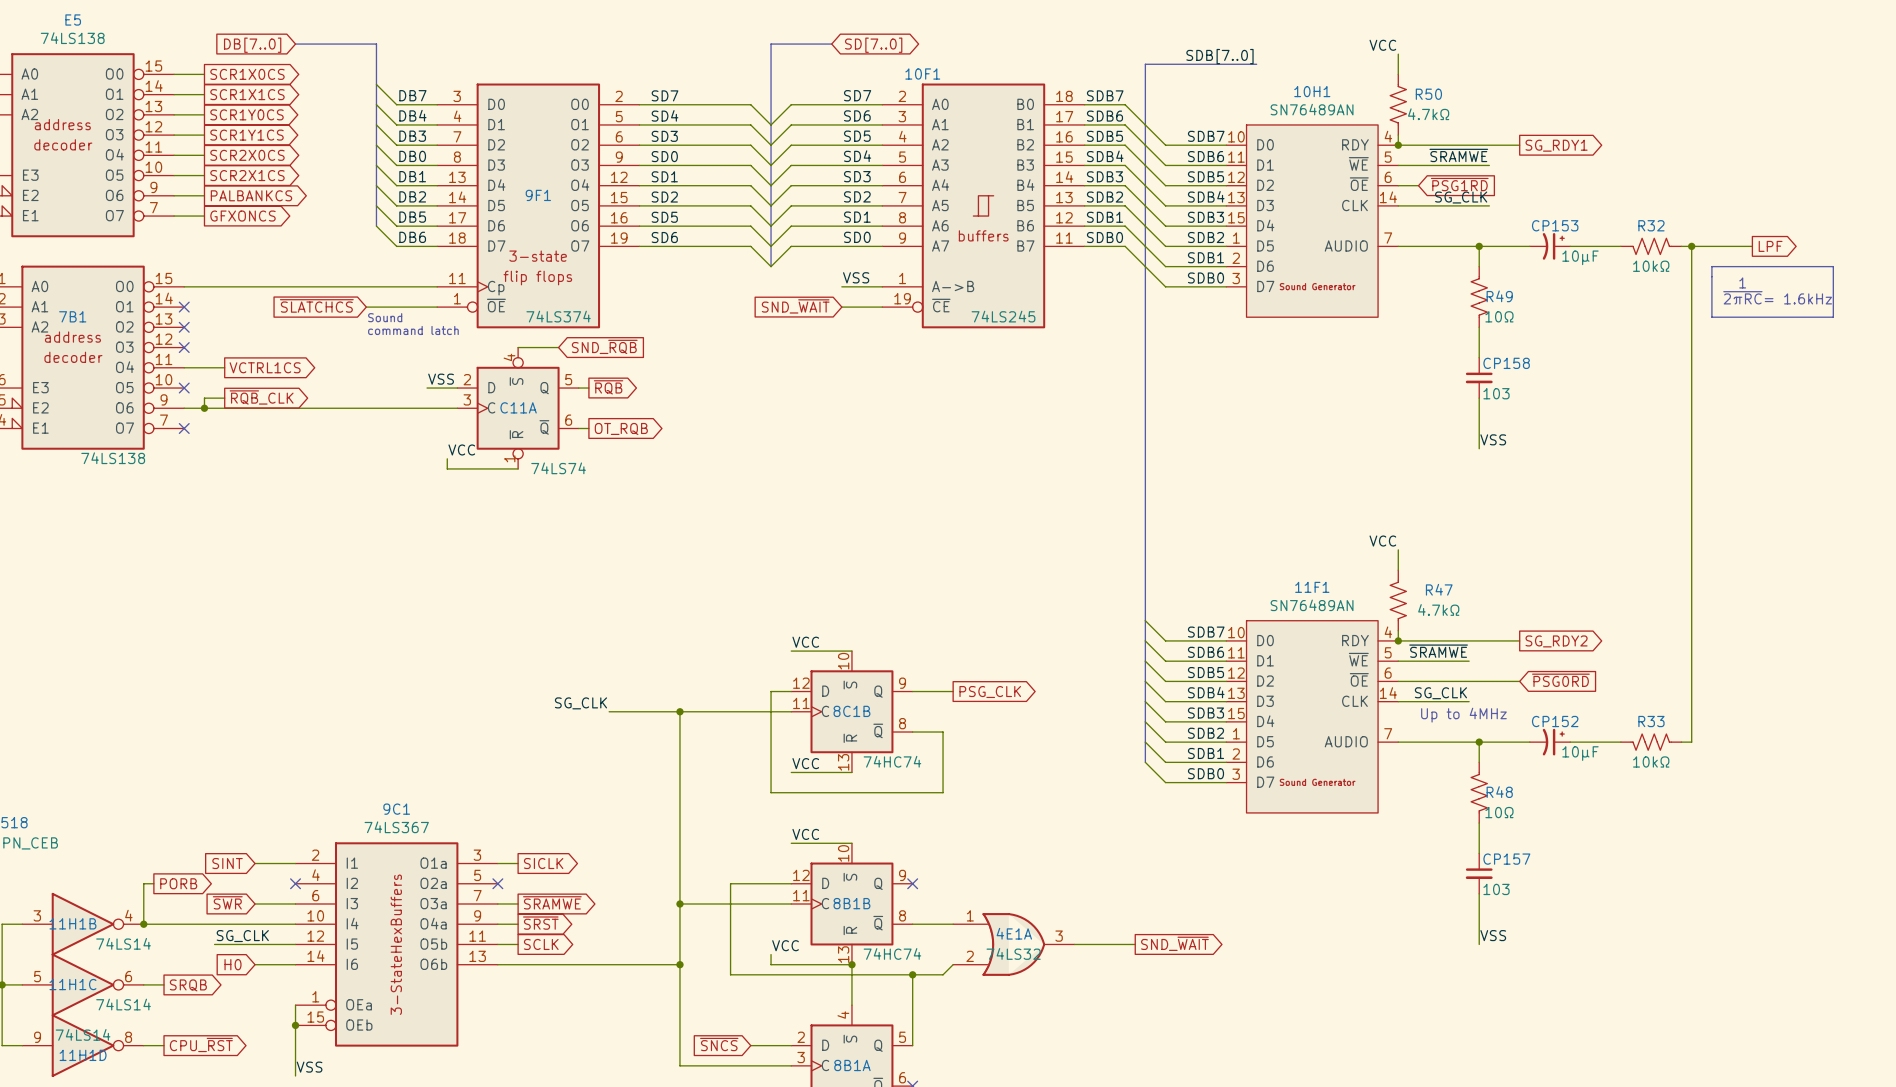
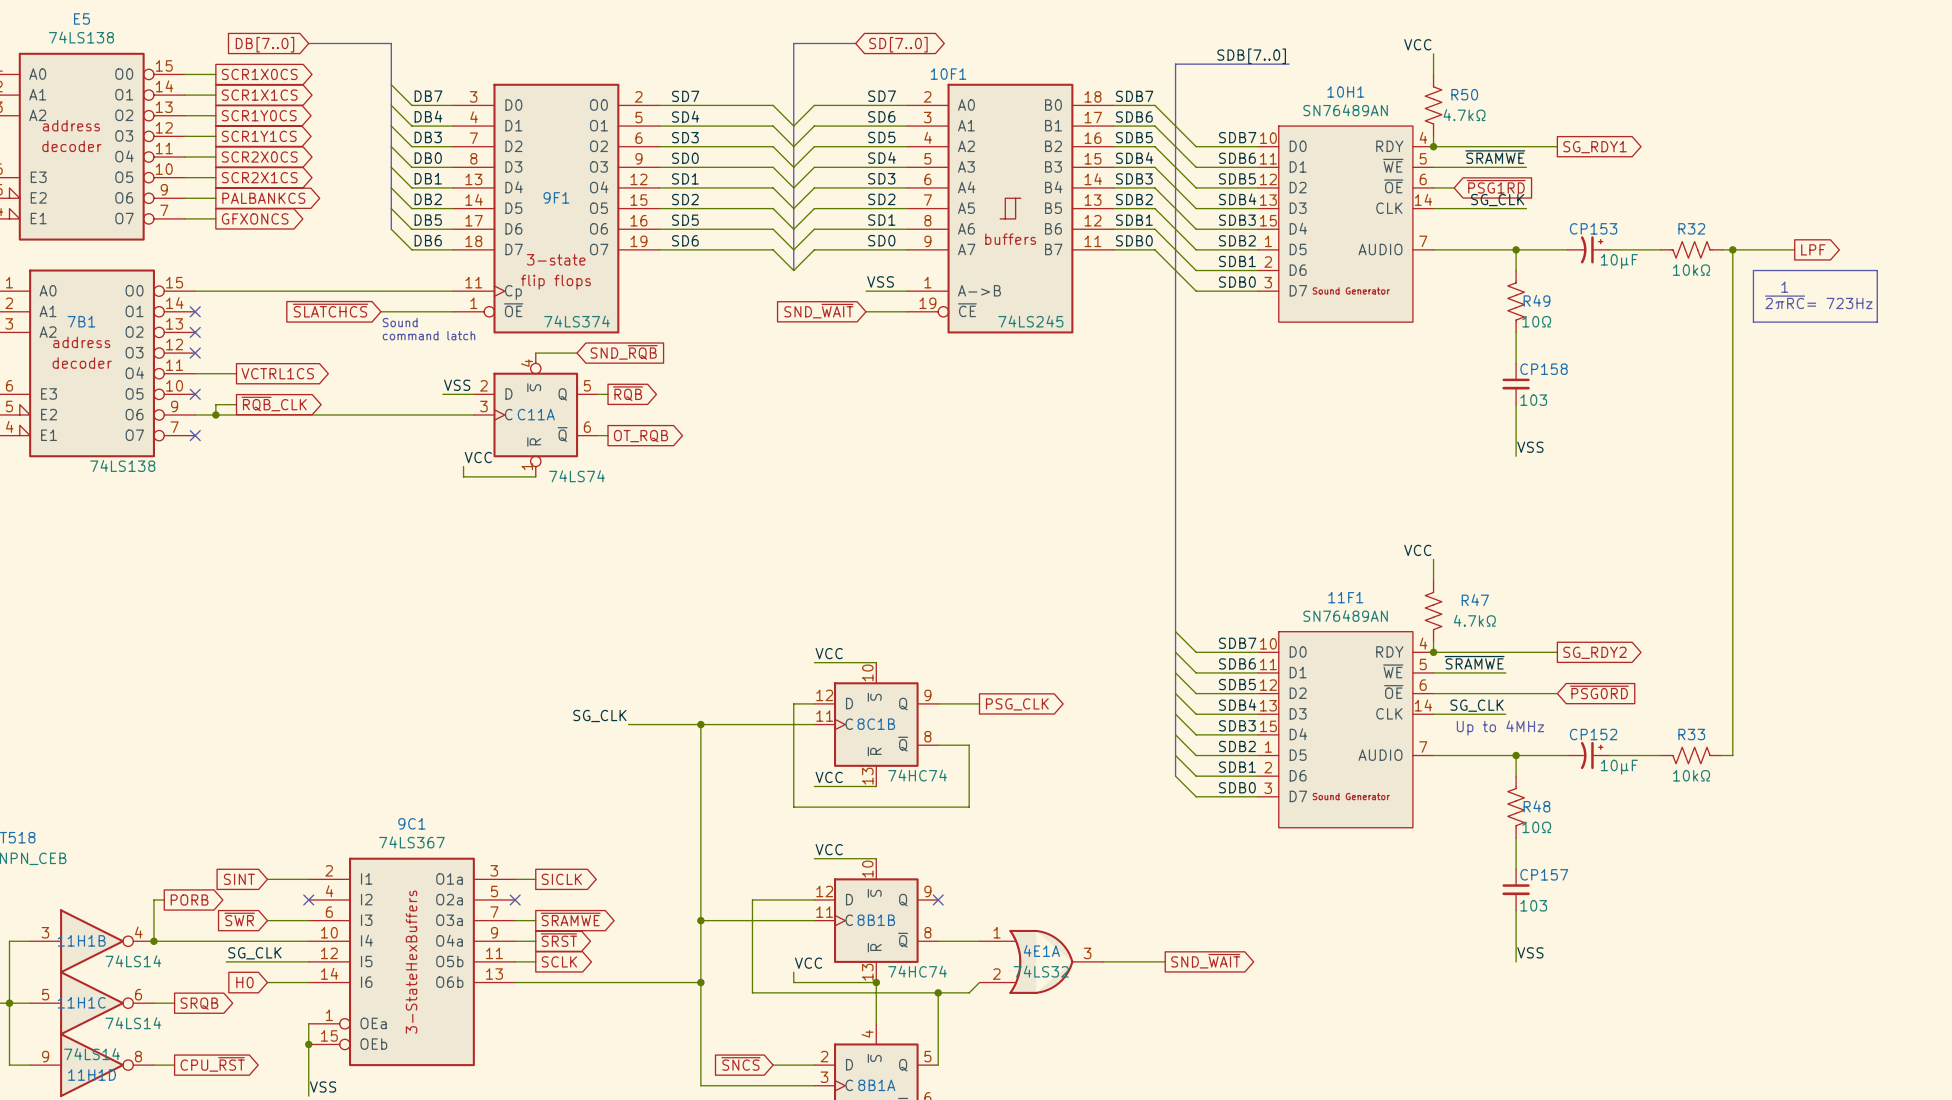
text: ~{2πRC}= 1.6kHz (1777, 297) -> ~{2πRC}= 723Hz (1818, 302)

